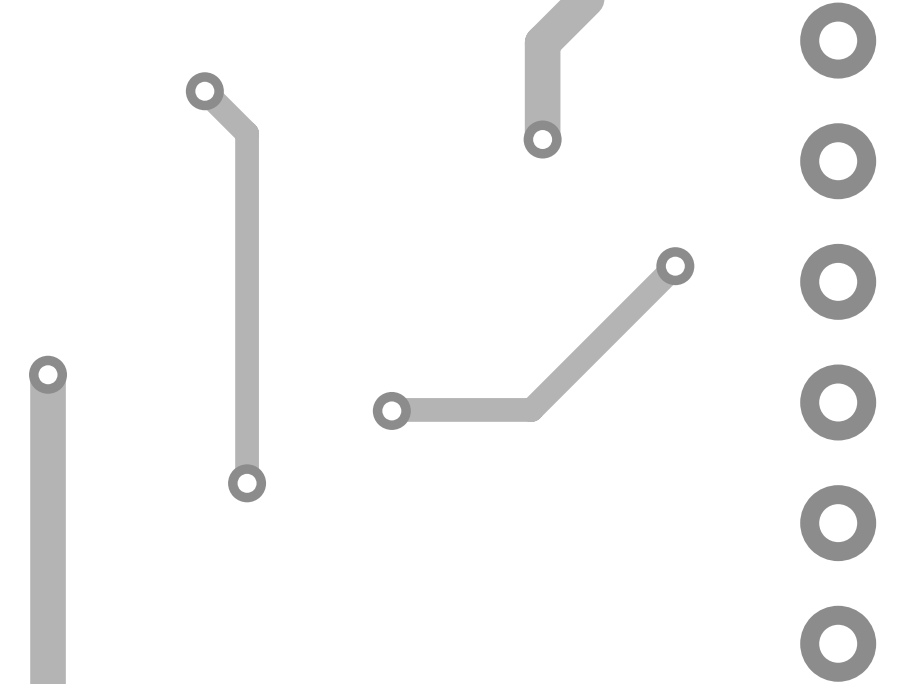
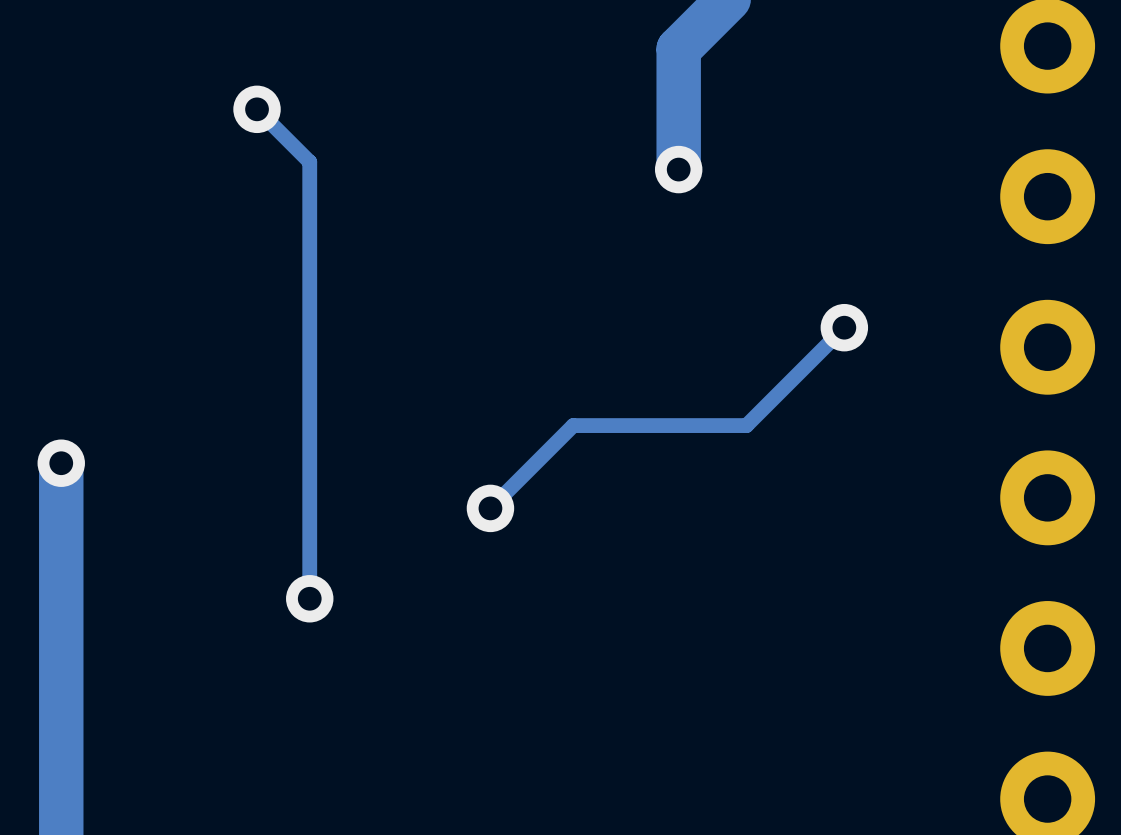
track width: thick (204, 91) (247, 133) (247, 483) -> thin (257, 109) (309, 162) (309, 598)
track width: thick (675, 266) (596, 344) -> thin (844, 327) (746, 425)
track: (596, 344) (531, 409) (392, 409) -> (746, 425) (573, 425) (491, 507)

